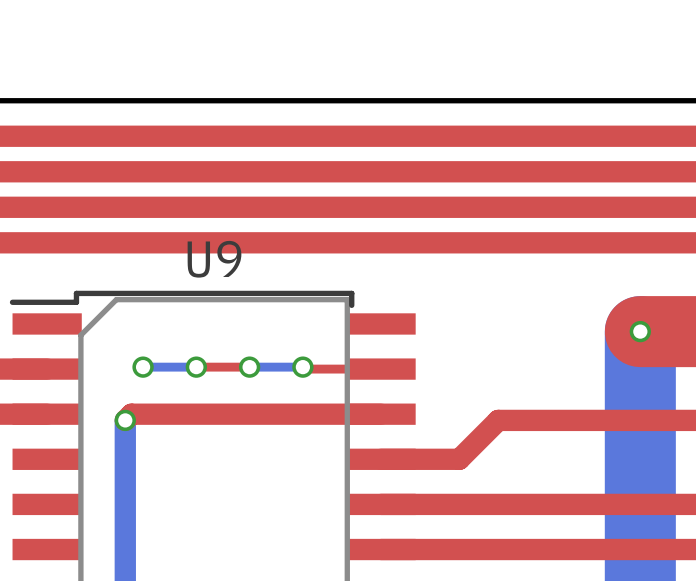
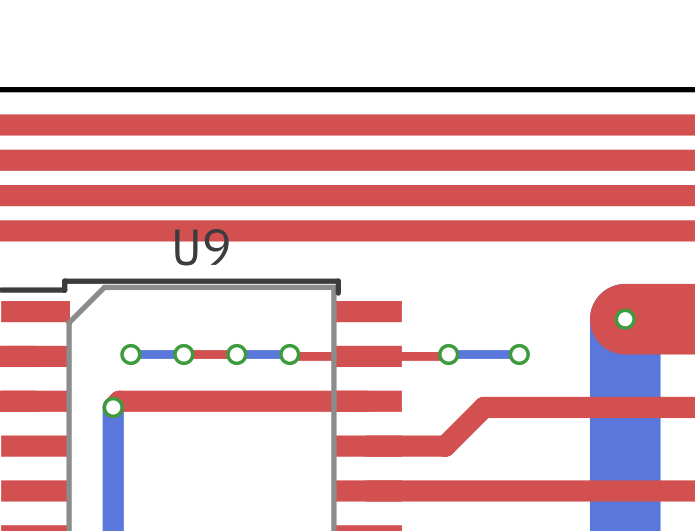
top track: none -> (448, 354) (446, 356) (367, 356)
bottom track: none -> (448, 354) (519, 354)
via: none -> (448, 354)
via: none -> (519, 354)

